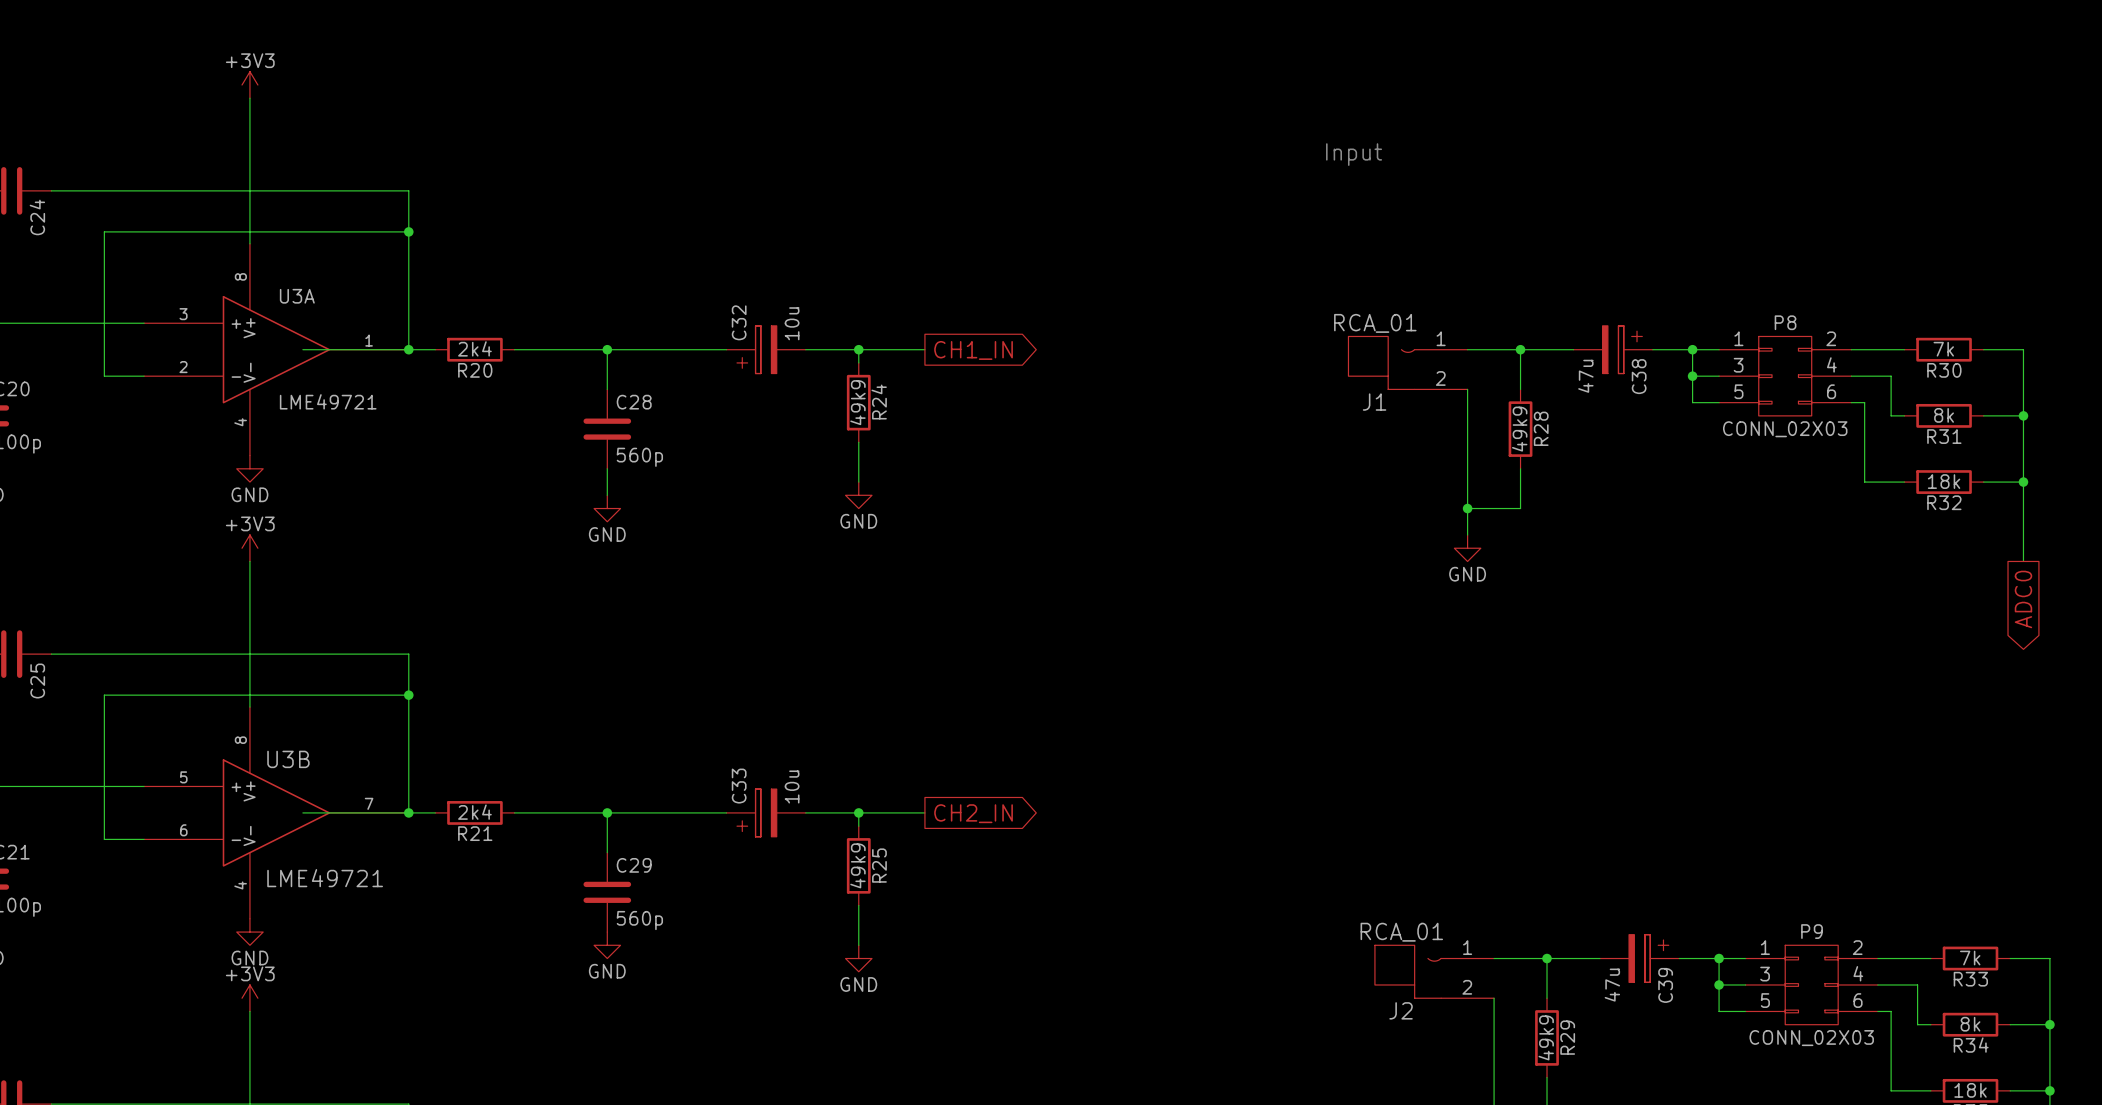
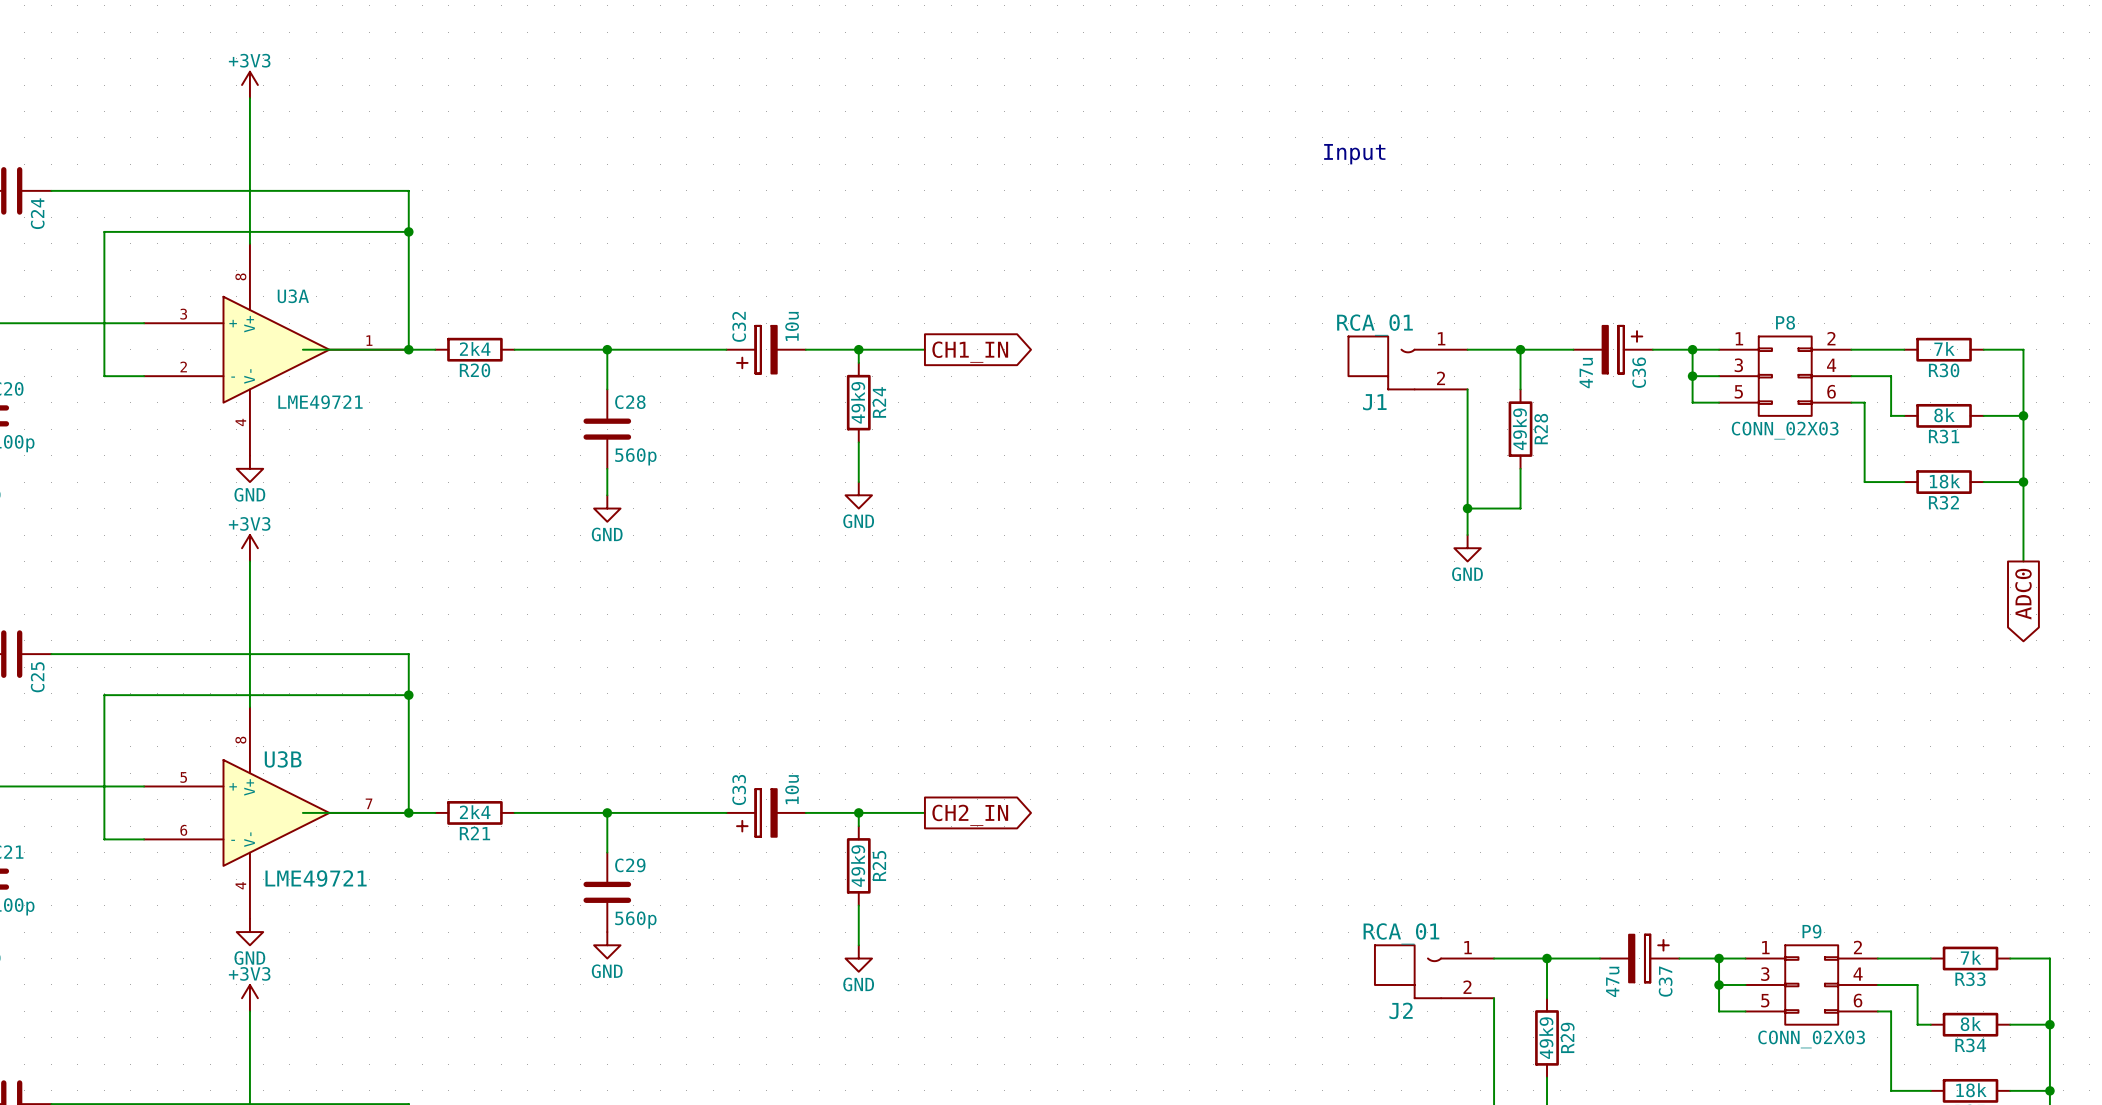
C38 name: C38 (1639, 376) -> C36 (1639, 372)
C39 name: C39 (1665, 985) -> C37 (1665, 981)

